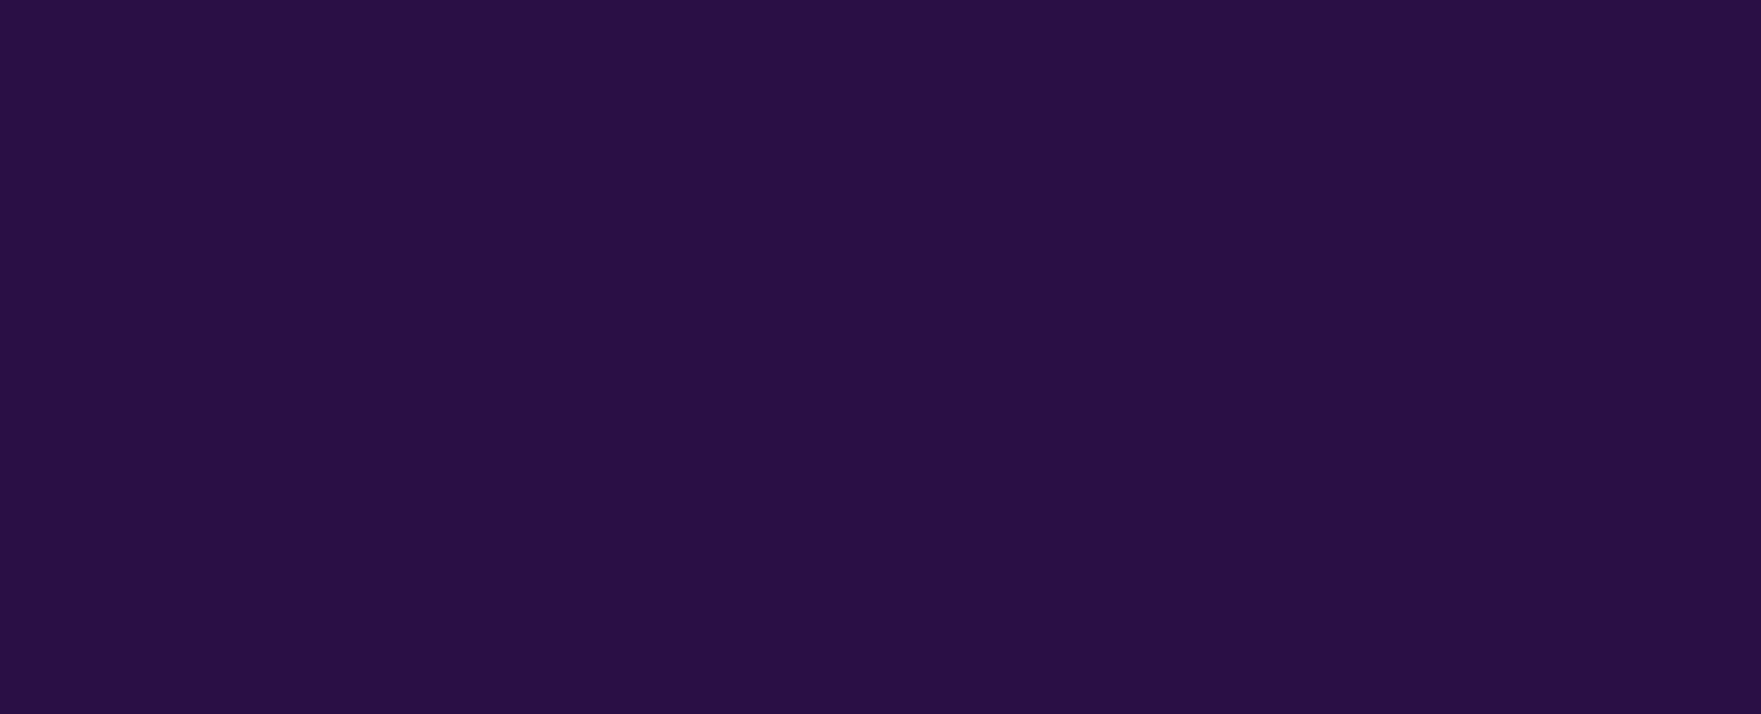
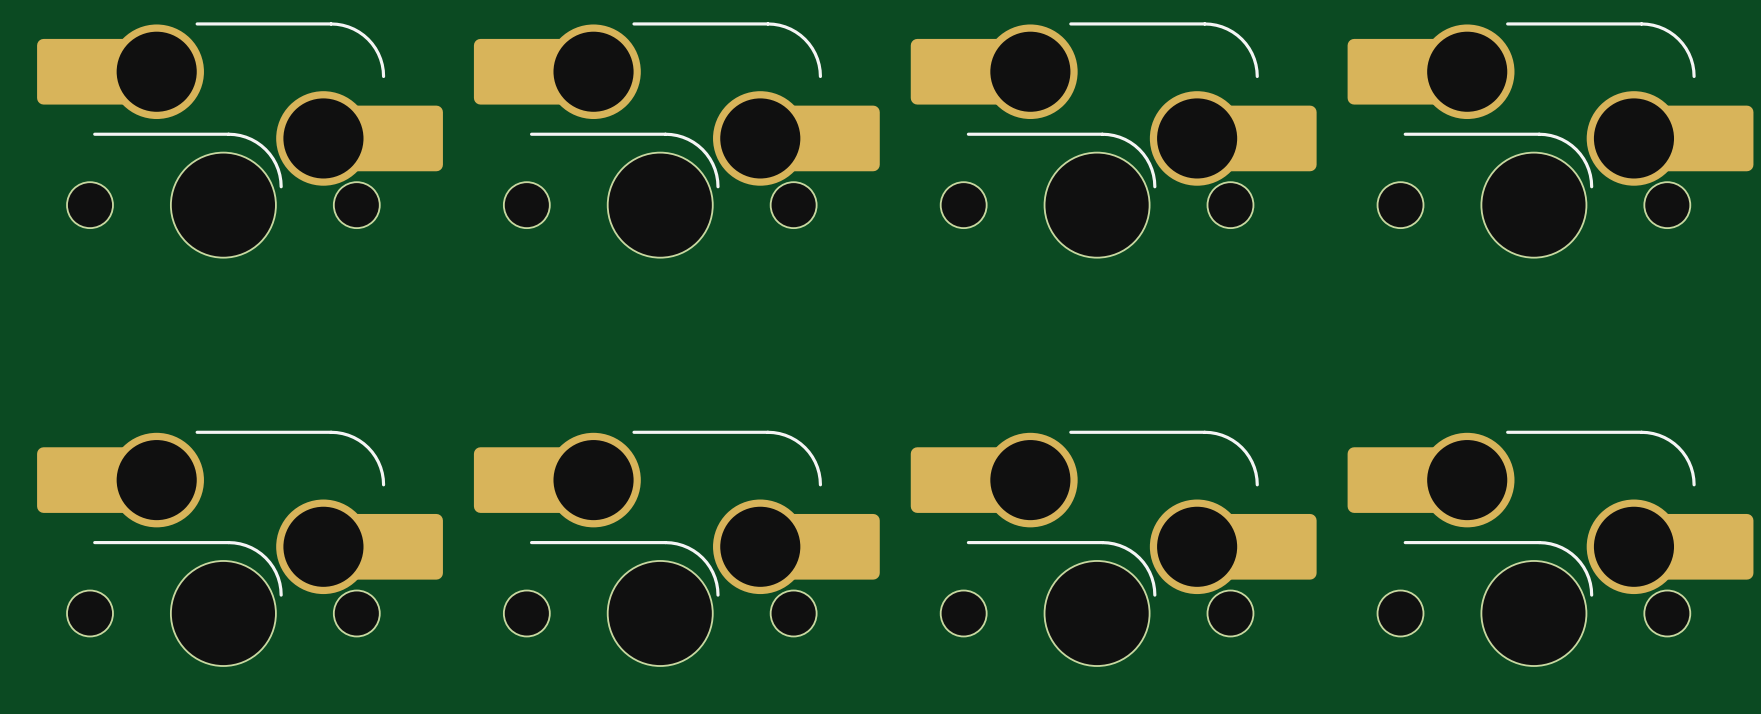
part: none -> (240, 140)
part: none -> (676, 140)
part: none -> (1113, 140)
part: none -> (1550, 140)
part: none -> (240, 548)
part: none -> (676, 548)
part: none -> (1113, 548)
part: none -> (1550, 548)

